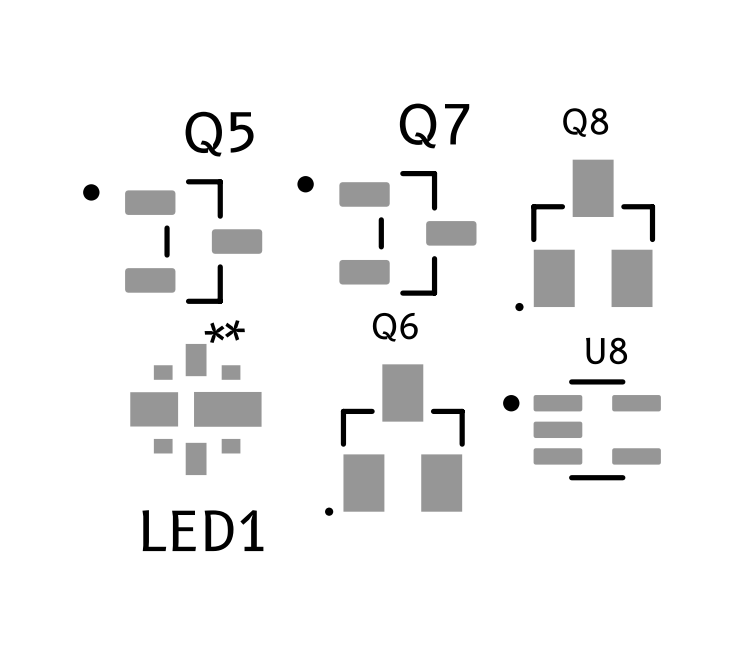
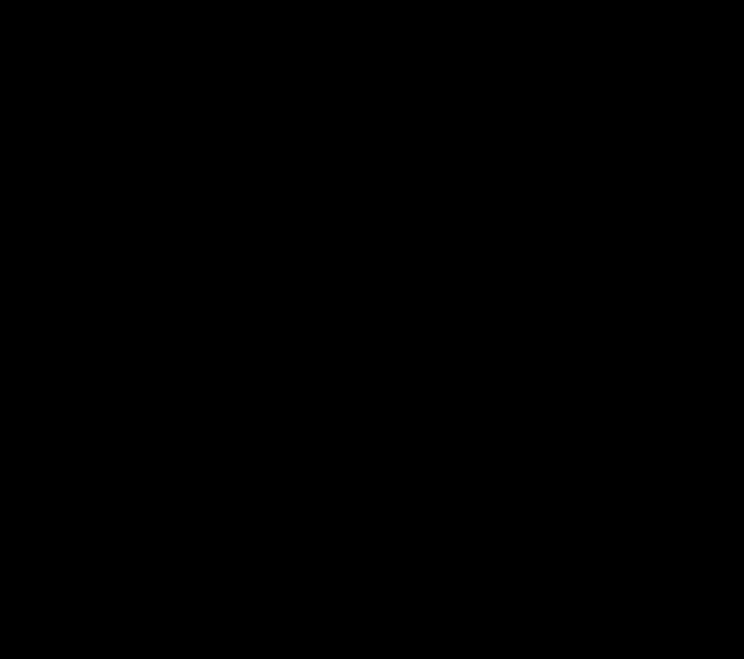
Q7: (386, 233) -> none
Q8: (585, 235) -> none
Q5: (172, 241) -> none
LED1: (195, 409) -> none
U8: (581, 429) -> none
Q6: (394, 440) -> none

